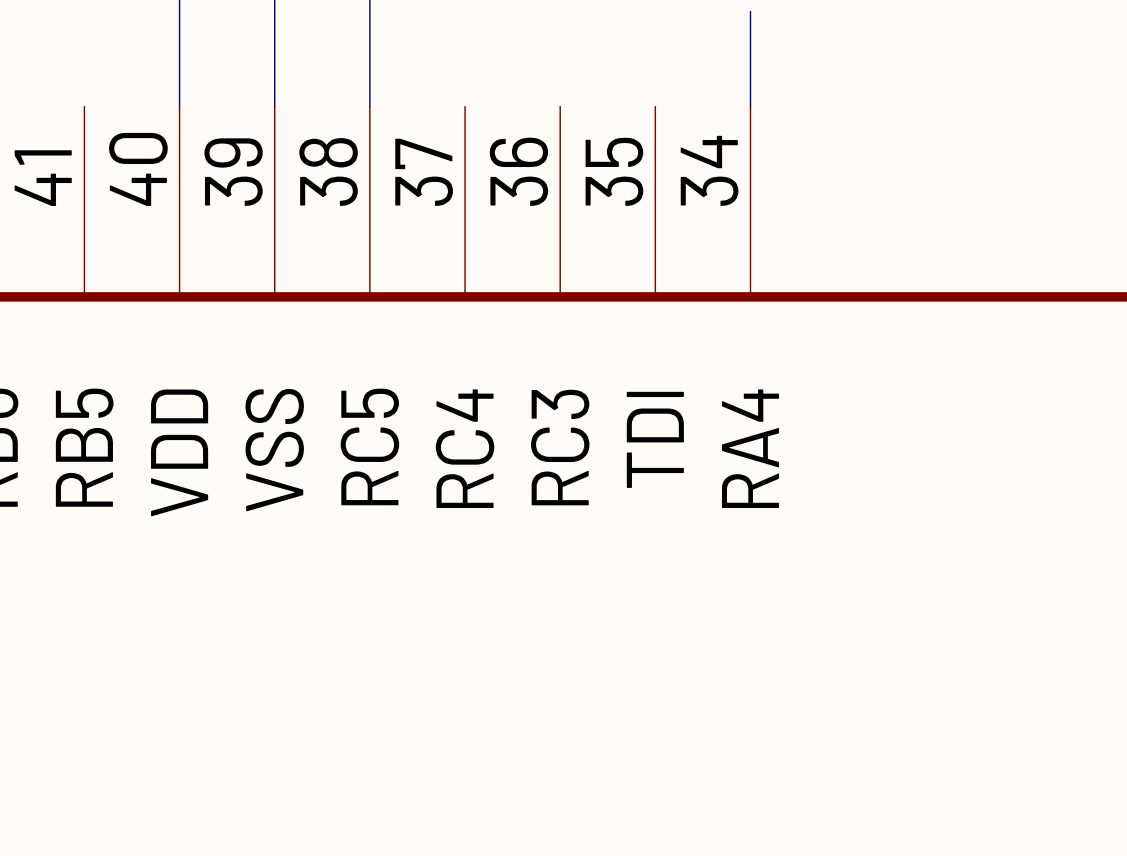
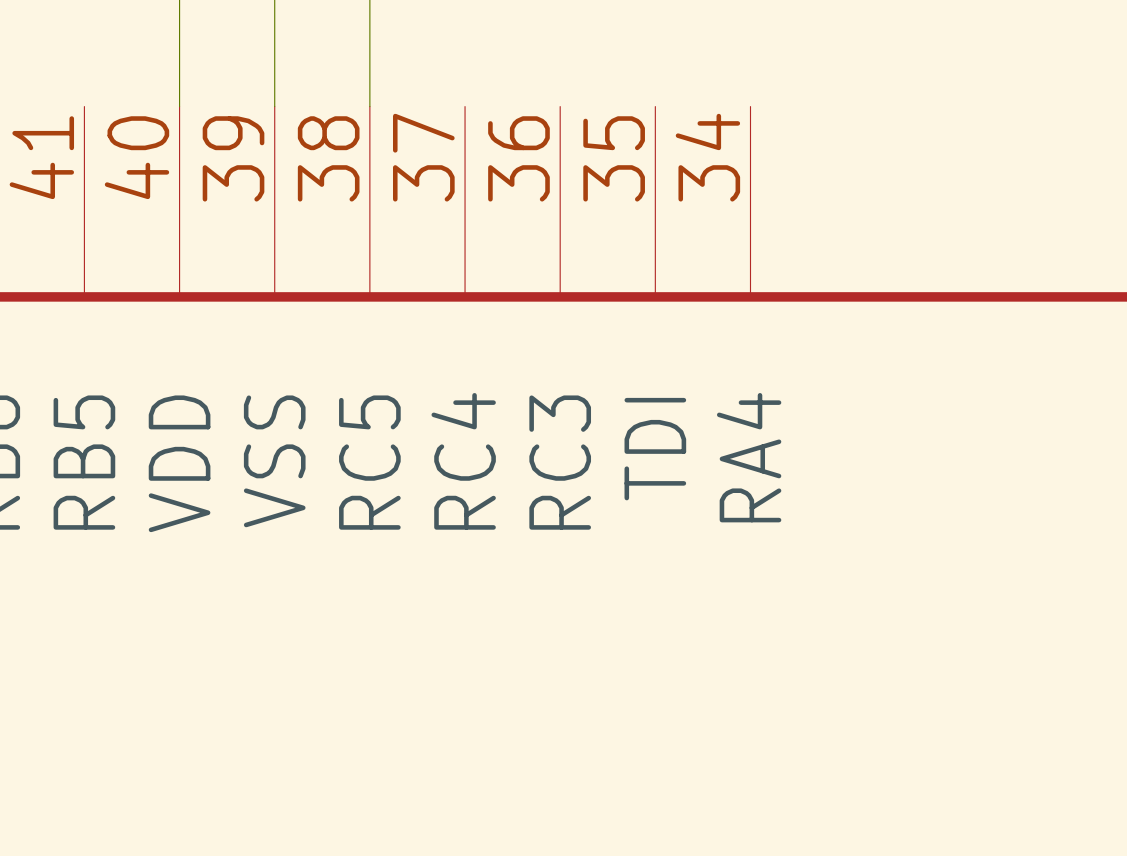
wire: (750, 11) (750, 106) -> none

